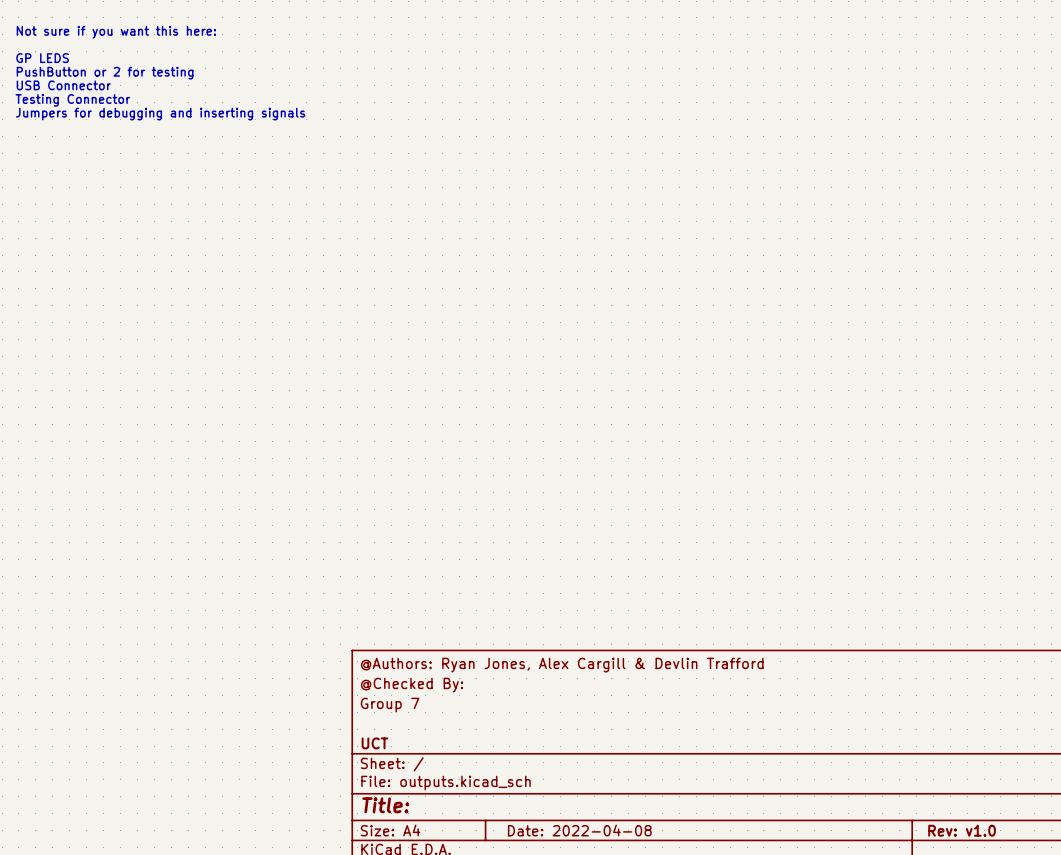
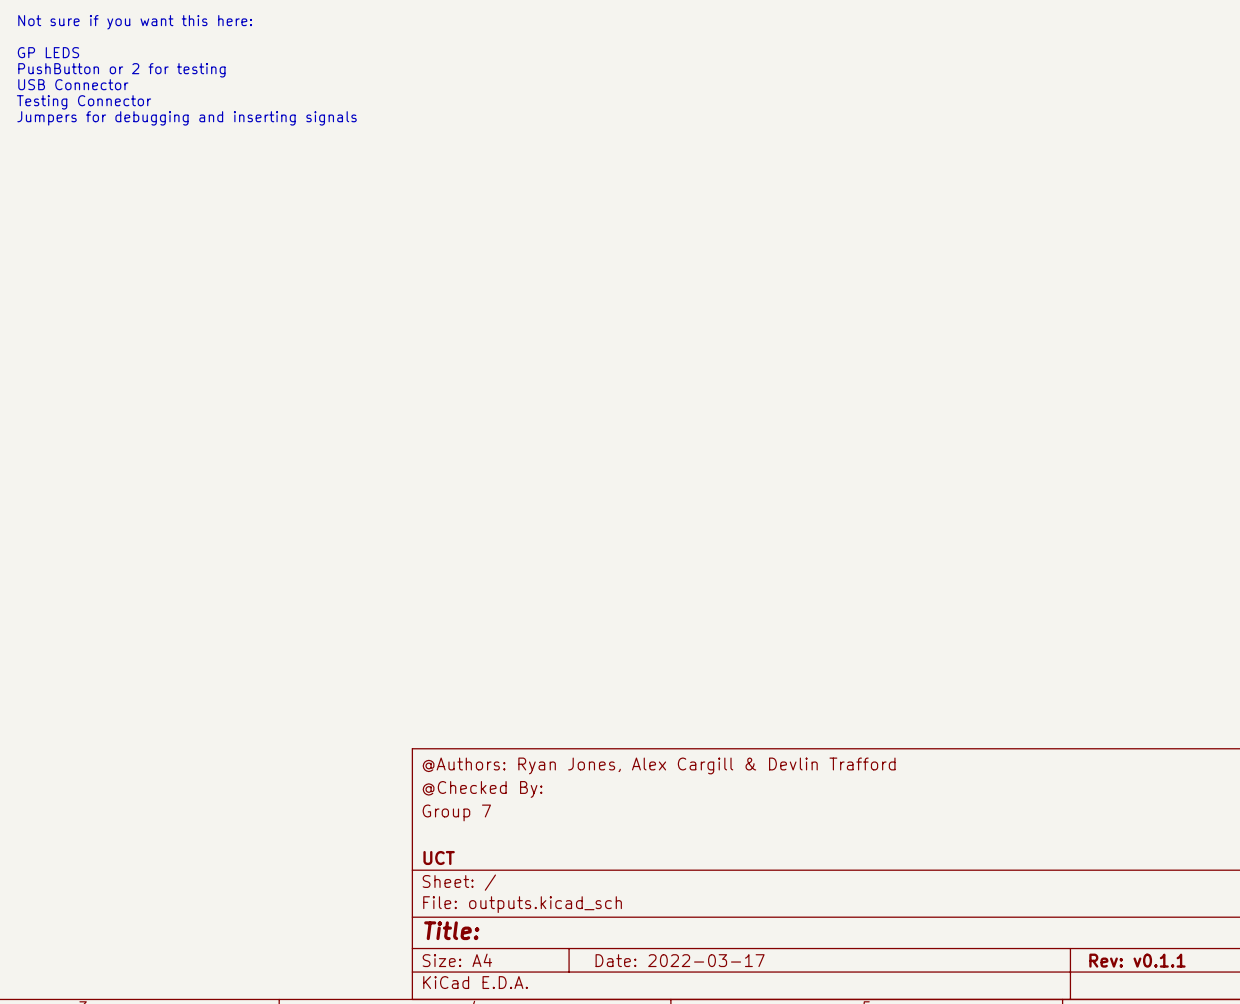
title block: Date: 2022-04-08 (579, 830) -> Date: 2022-03-17 (680, 960)
title block: Rev: v1.0 (962, 830) -> Rev: v0.1.1 (1137, 960)

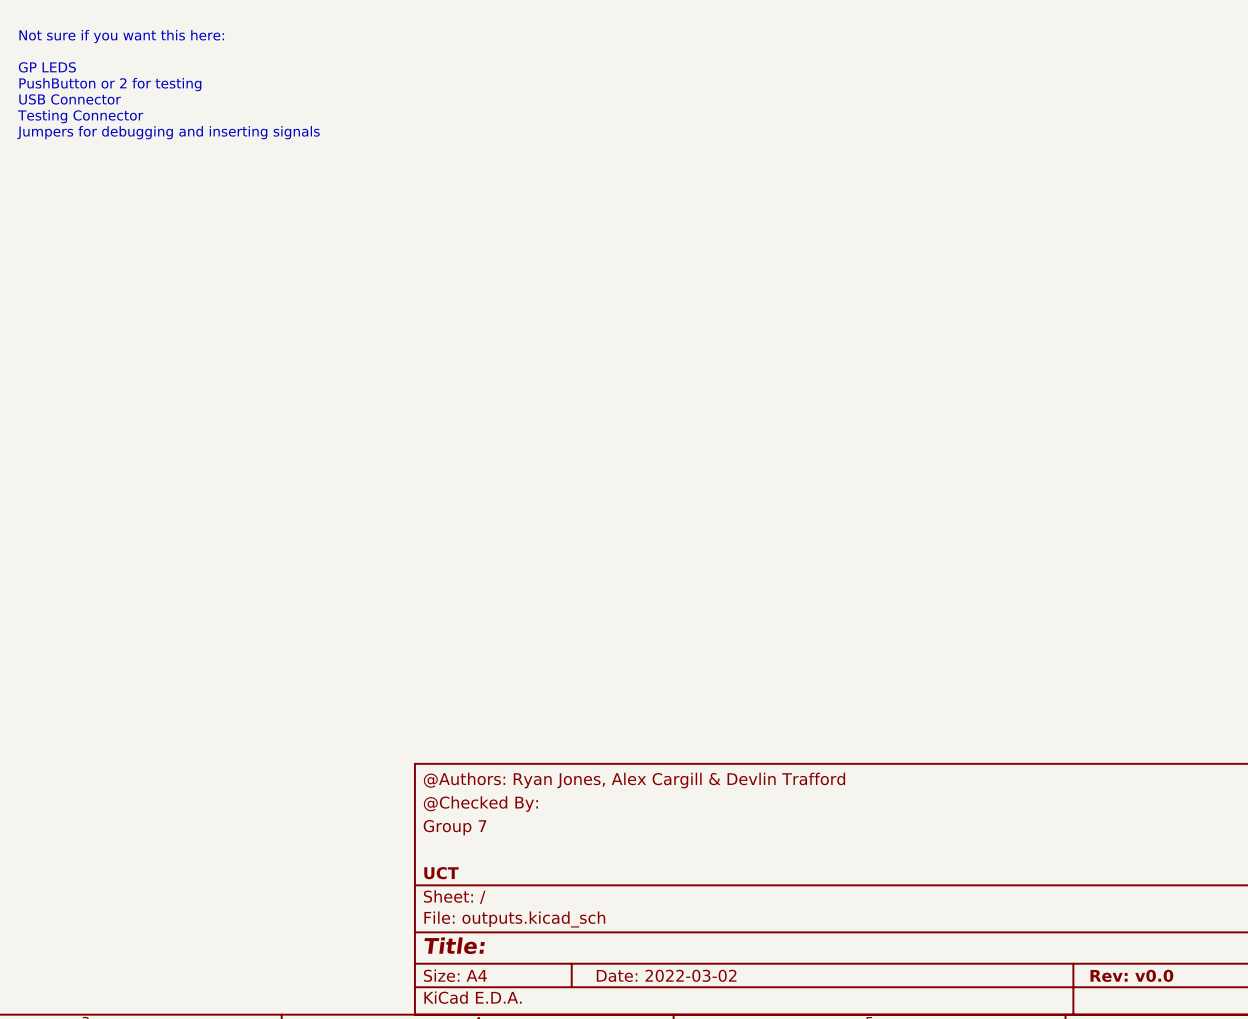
title block: Date: 2022-03-17 (680, 960) -> Date: 2022-03-02 (666, 975)
title block: Rev: v0.1.1 (1137, 960) -> Rev: v0.0 (1131, 975)

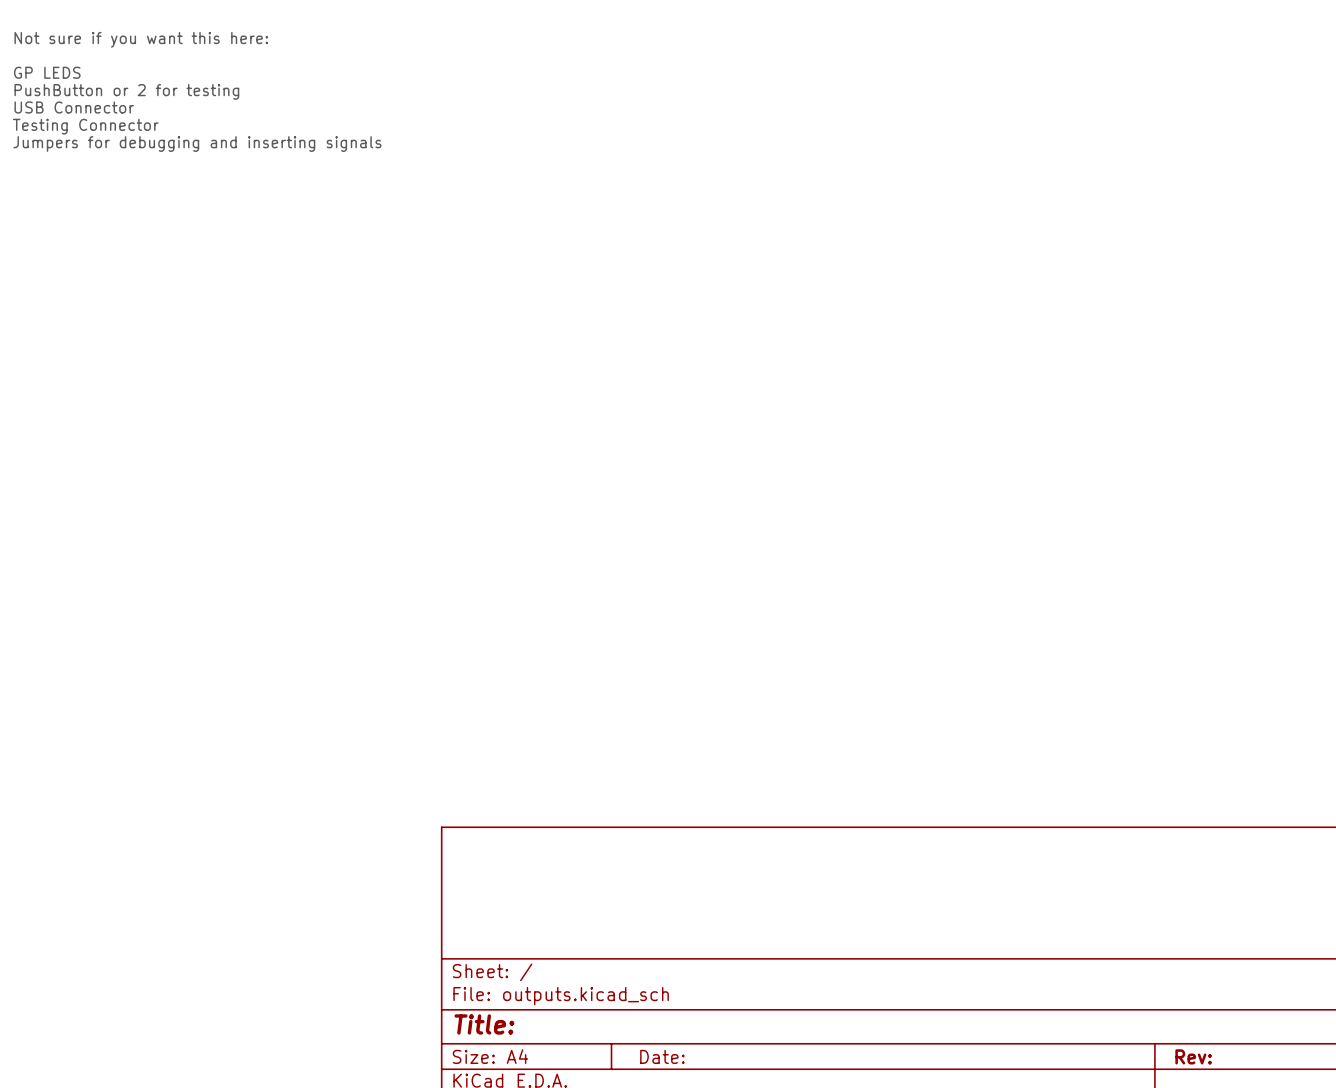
title block: @Authors: Ryan Jones, Alex Cargill & Devlin Trafford (634, 780) -> none
title block: @Checked By: (480, 804) -> none
title block: Group 7 (454, 827) -> none
title block: UCT (441, 873) -> none
title block: Date: 2022-03-02 (666, 975) -> Date: (662, 1056)
title block: Rev: v0.0 (1131, 975) -> Rev: (1193, 1056)

